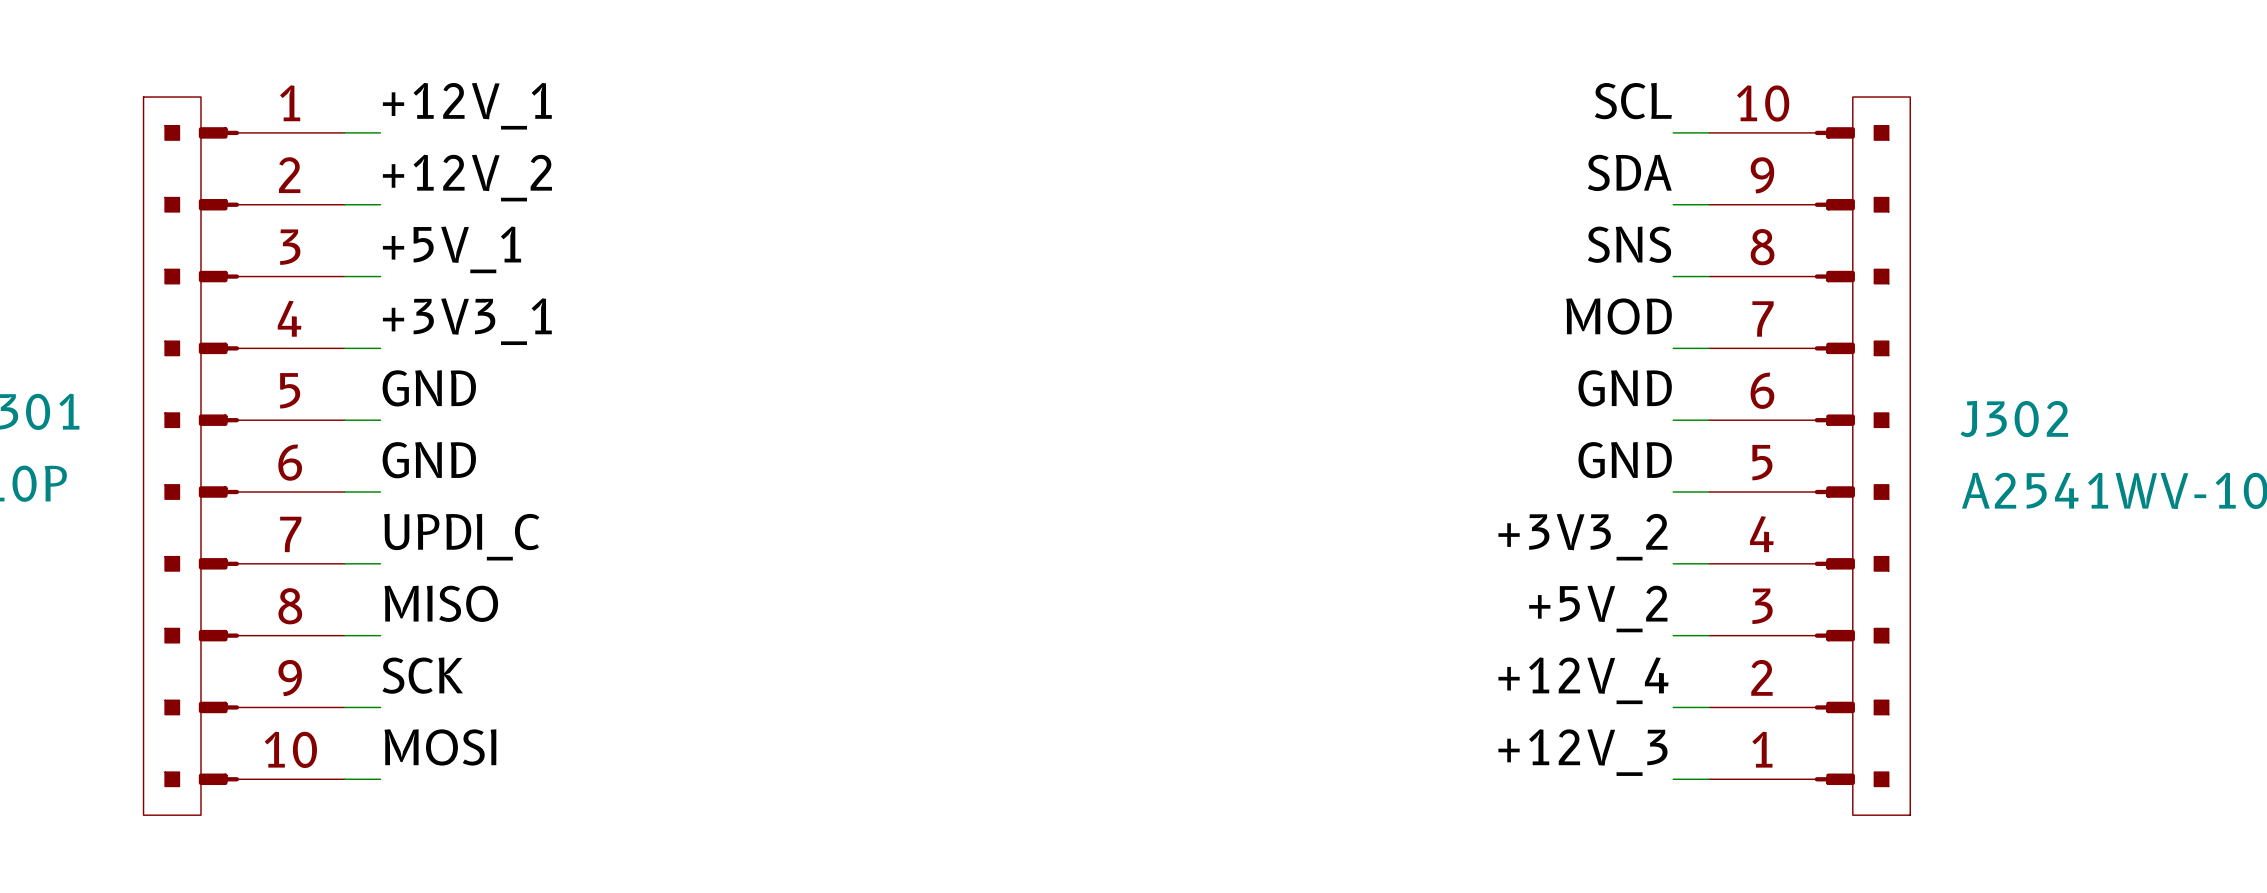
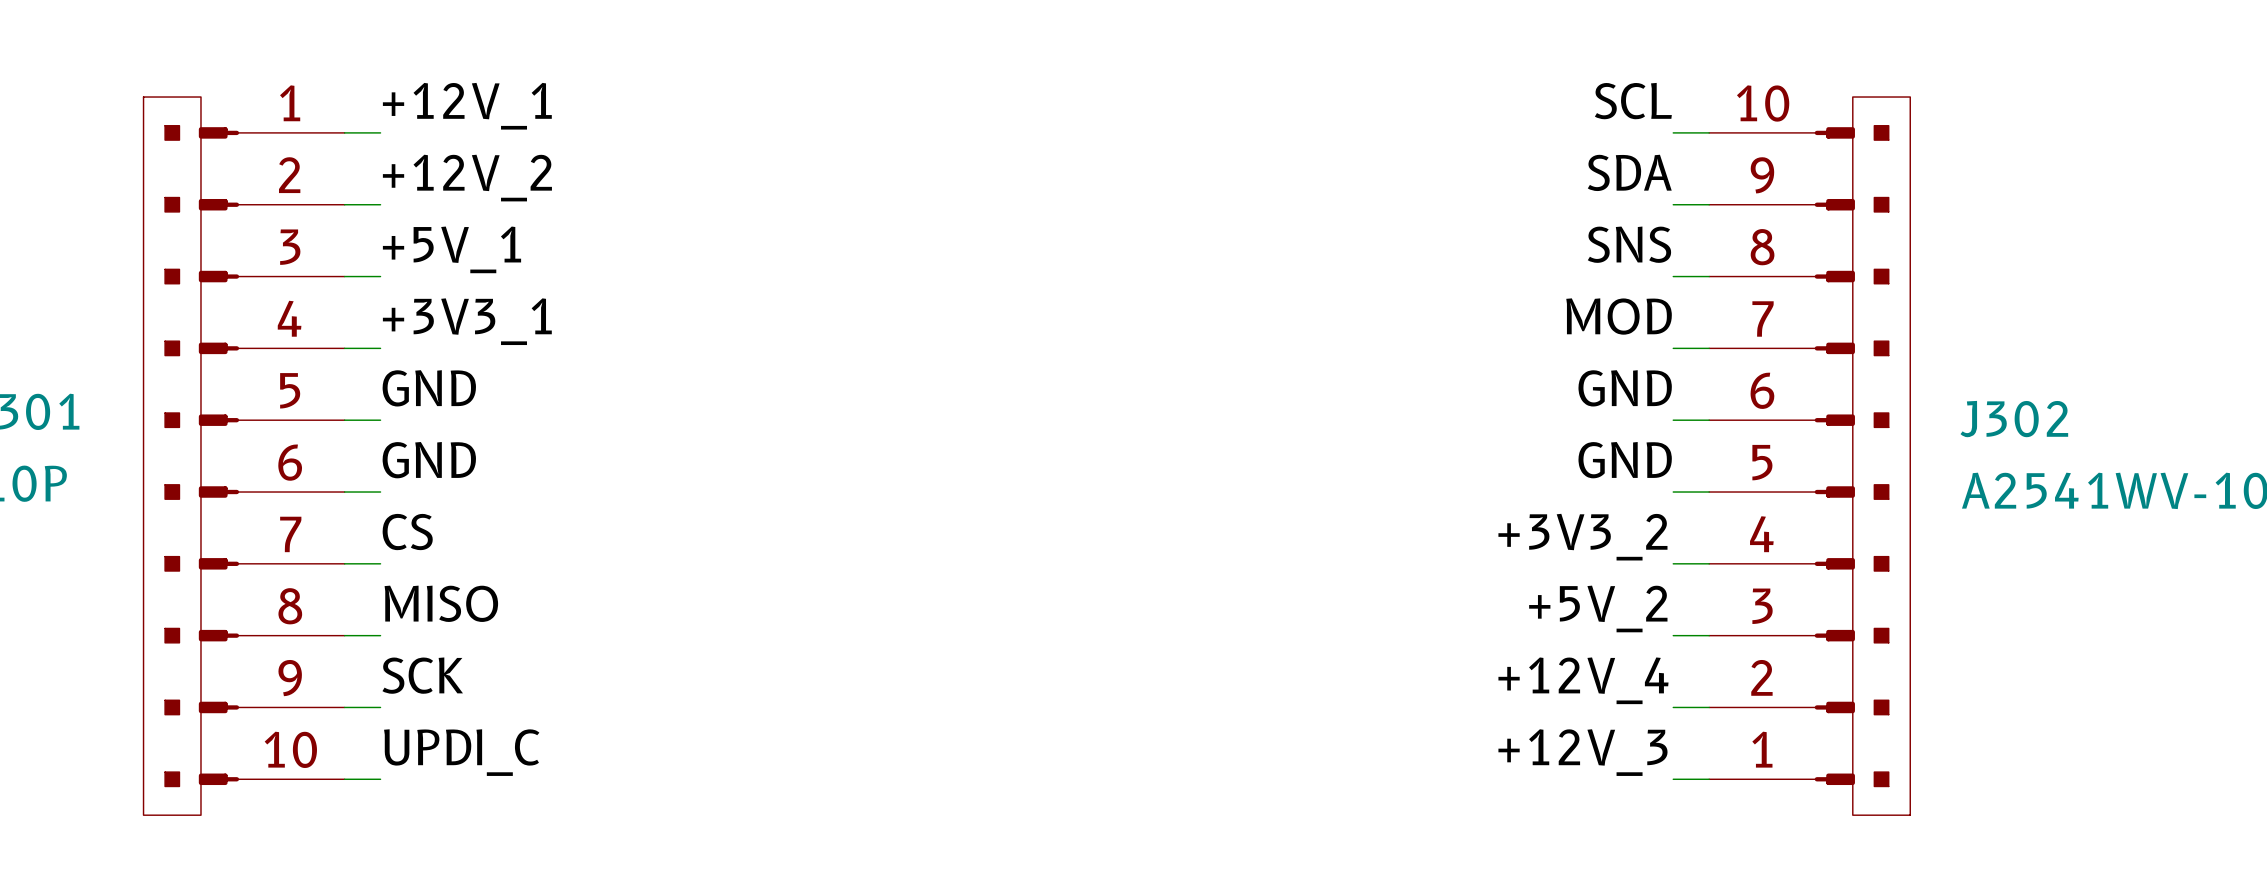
label: UPDI_C (461, 537) -> CS (407, 532)
label: MOSI (440, 747) -> UPDI_C (461, 752)

